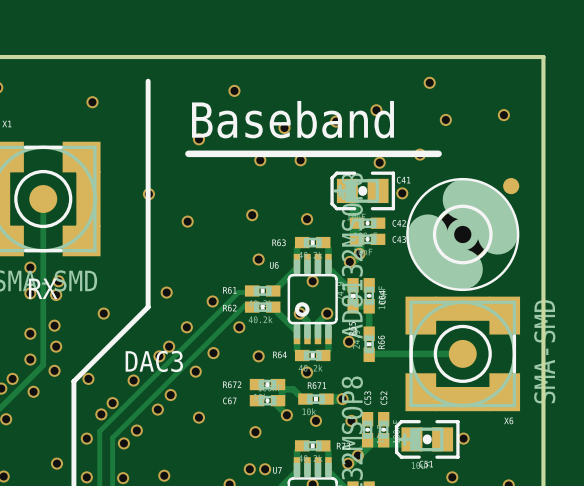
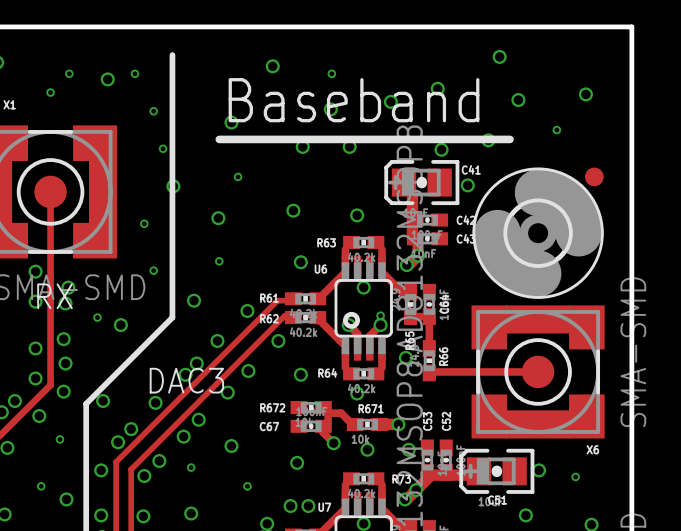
via: none -> (69, 73)
via: none -> (134, 73)
via: none -> (331, 73)
via: none -> (50, 92)
via: none -> (153, 111)
via: none -> (556, 130)
via: none -> (163, 148)
via: none -> (238, 176)
via: none -> (144, 223)
via: none -> (219, 261)
via: none -> (153, 270)
via: none -> (380, 315)
via: none -> (97, 317)
via: none -> (59, 439)
via: none -> (191, 467)
via: none -> (575, 476)
via: none -> (41, 486)
via: none -> (247, 486)

